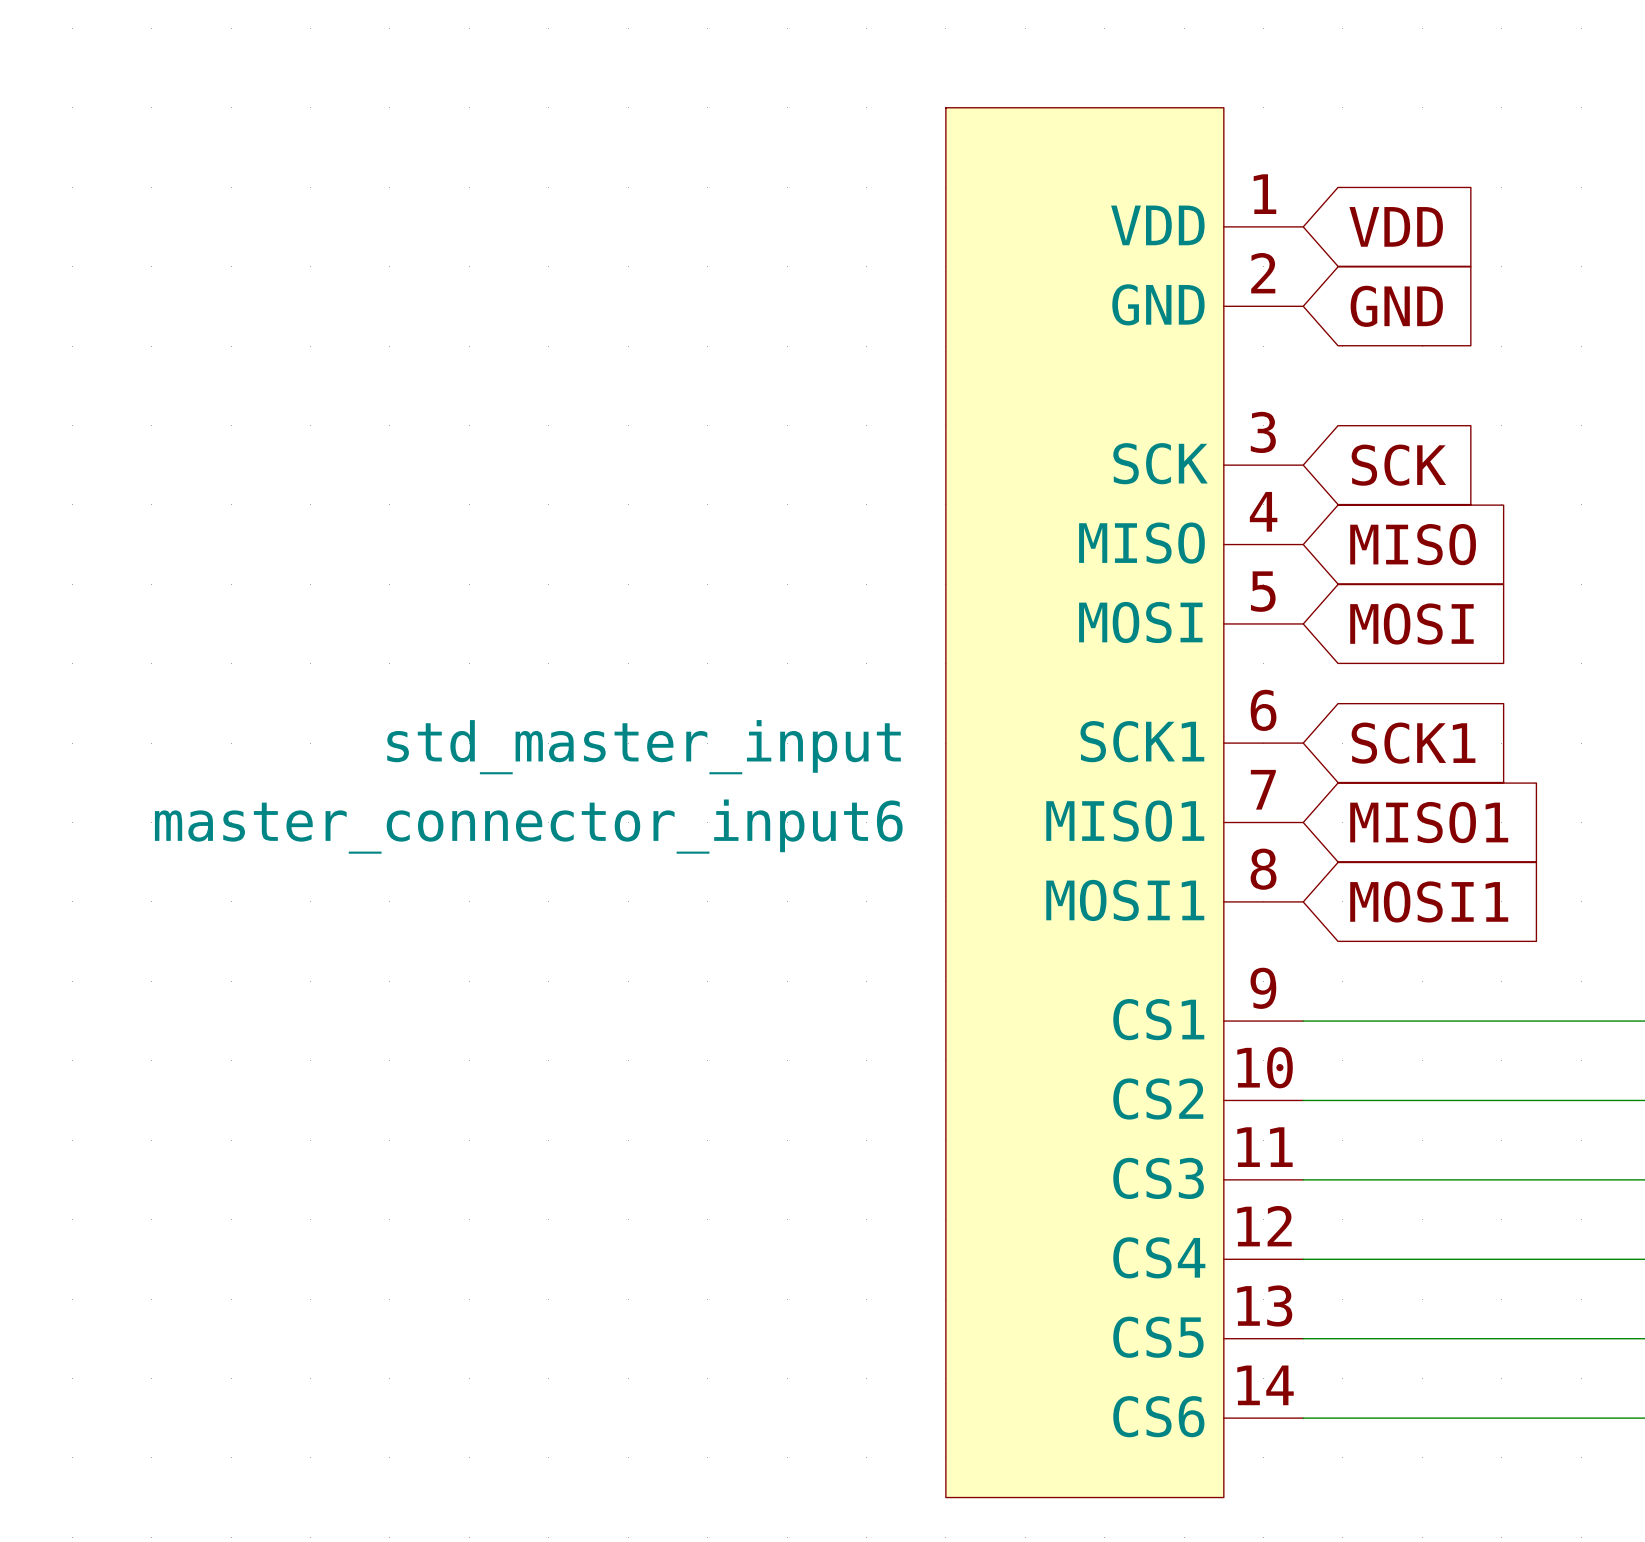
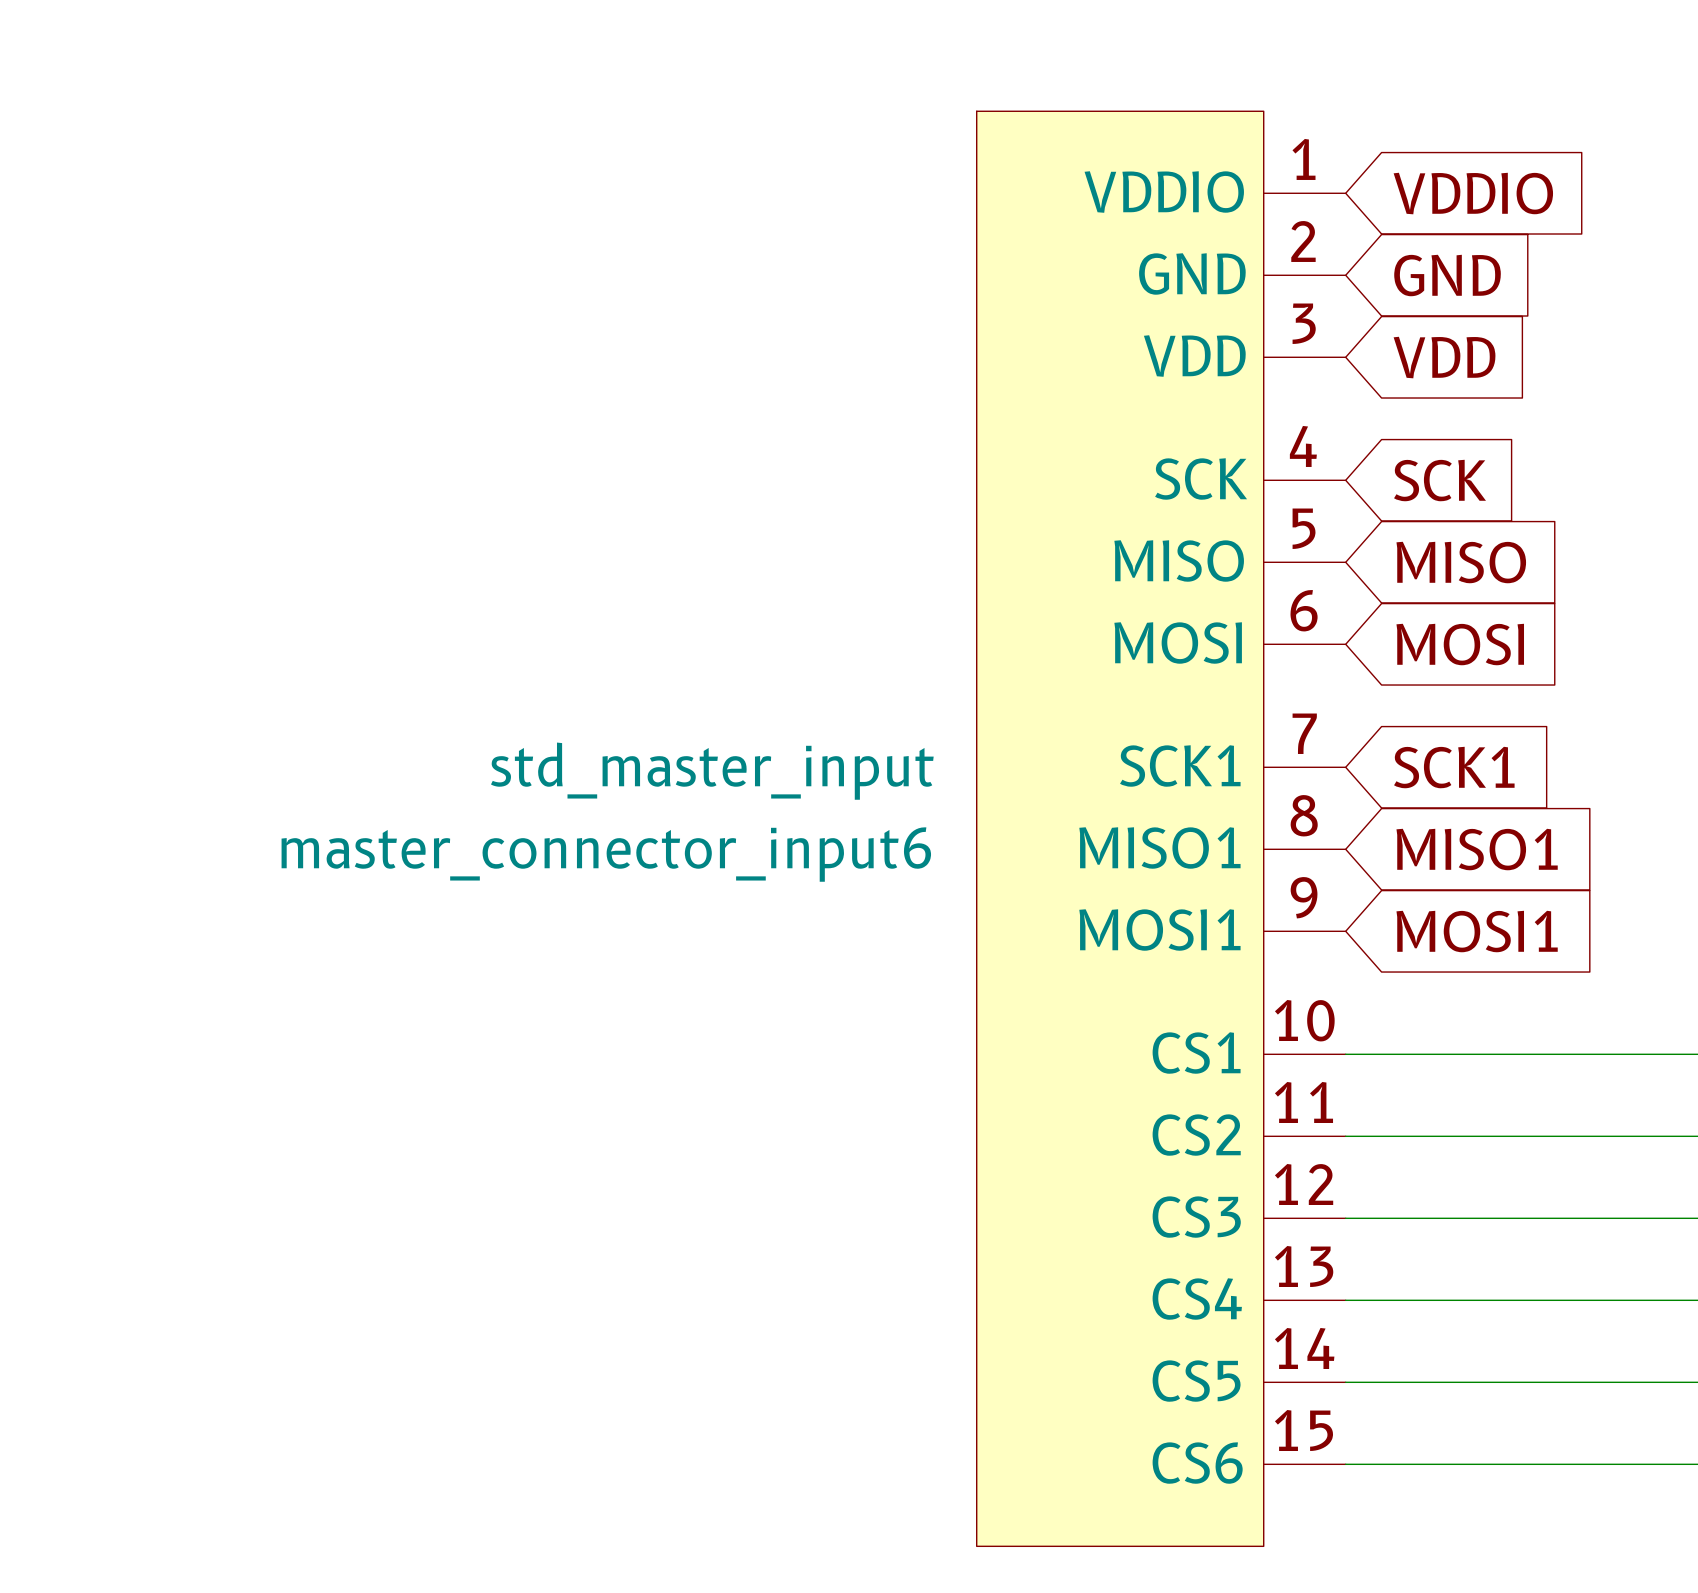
master_connector_input6 symbol: [945, 107, 1304, 1498] -> [976, 111, 1346, 1547]
global label: none -> VDDIO (1473, 193)
global label position: VDD (1396, 226) -> VDD (1444, 357)
global label position: GND (1396, 306) -> GND (1447, 275)

